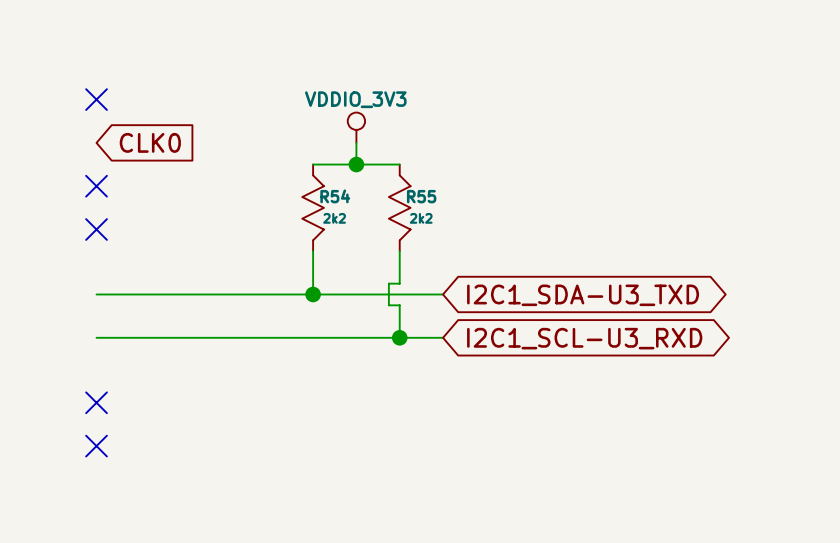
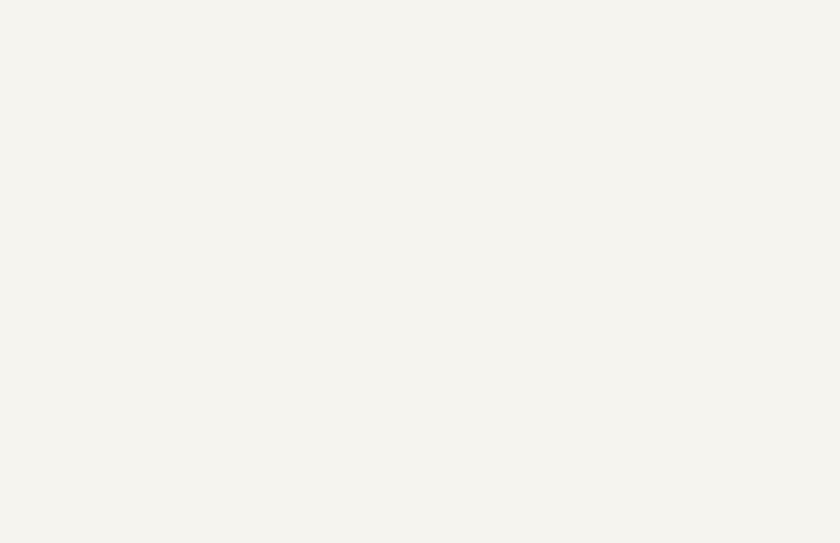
no-connect mark: (96, 99) -> none
power symbol: VDDIO_3V3 (356, 127) -> none
global label: CLK0 (150, 142) -> none
wire: (356, 142) (356, 164) -> none
wire: (313, 164) (399, 164) -> none
junction: (356, 164) -> none
no-connect mark: (96, 186) -> none
R54: 2k2 (313, 207) -> none
R55: 2k2 (399, 207) -> none
no-connect mark: (96, 229) -> none
wire: (313, 251) (313, 294) -> none
wire: (399, 251) (399, 283) (388, 283) (388, 305) (399, 305) (399, 337) -> none
wire: (96, 294) (443, 294) -> none
junction: (313, 294) -> none
global label: I2C1_SDA-U3_TXD (583, 295) -> none
wire: (96, 337) (443, 337) -> none
junction: (399, 337) -> none
global label: I2C1_SCL-U3_RXD (584, 338) -> none
no-connect mark: (96, 402) -> none
no-connect mark: (96, 446) -> none

